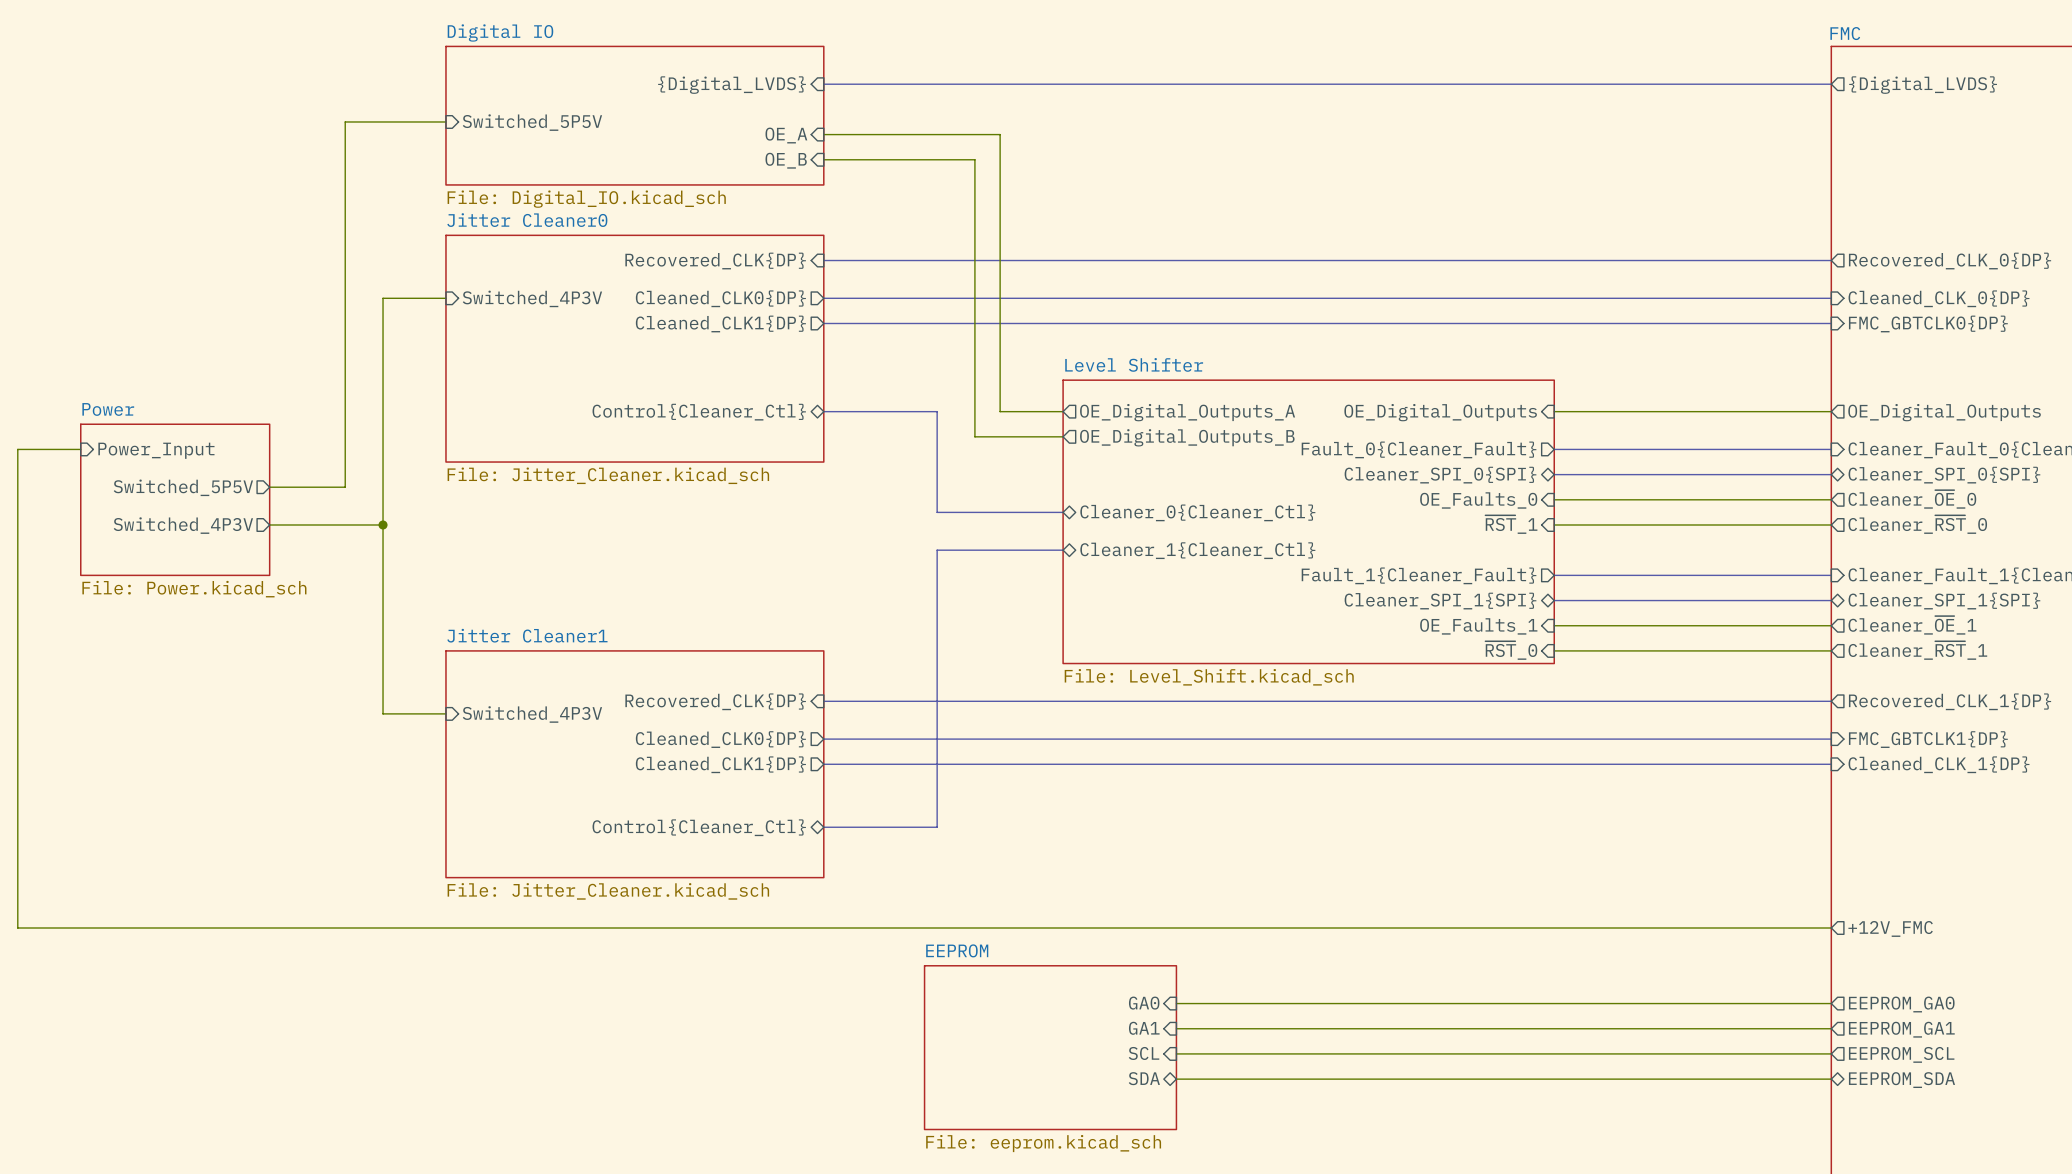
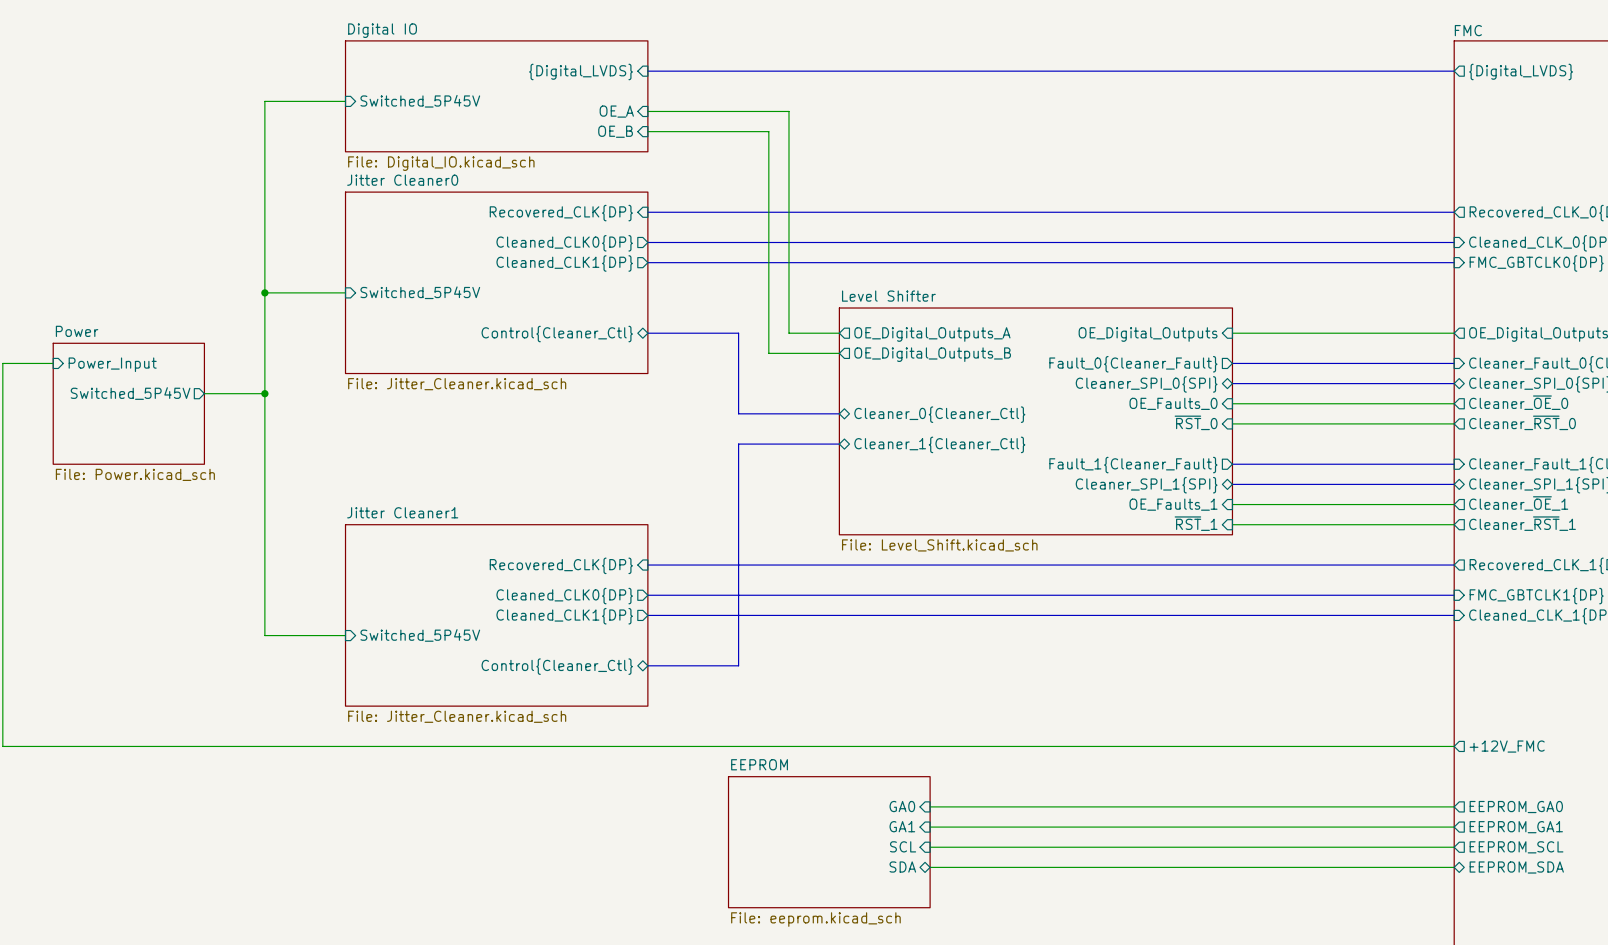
sheet pin: Switched_5P5V (532, 122) -> Switched_5P45V (420, 101)
wire: (445, 298) (383, 298) (383, 713) (445, 713) -> none
sheet pin: Switched_4P3V (532, 298) -> none
wire: none -> (264, 292) (345, 292)
junction: none -> (264, 292)
sheet pin: none -> Switched_5P45V (420, 292)
sheet pin: Switched_5P5V (183, 487) -> Switched_5P45V (130, 393)
wire: none -> (264, 393) (264, 635) (345, 635)
wire: (269, 524) (383, 524) -> none
junction position: (383, 524) -> (264, 393)
sheet pin: ~{RST}_1 (1511, 524) -> ~{RST}_0 (1196, 422)
sheet pin: Switched_4P3V (183, 525) -> none
sheet pin: ~{RST}_0 (1511, 650) -> ~{RST}_1 (1196, 523)
sheet pin: Switched_4P3V (532, 714) -> none
sheet pin: none -> Switched_5P45V (420, 635)

